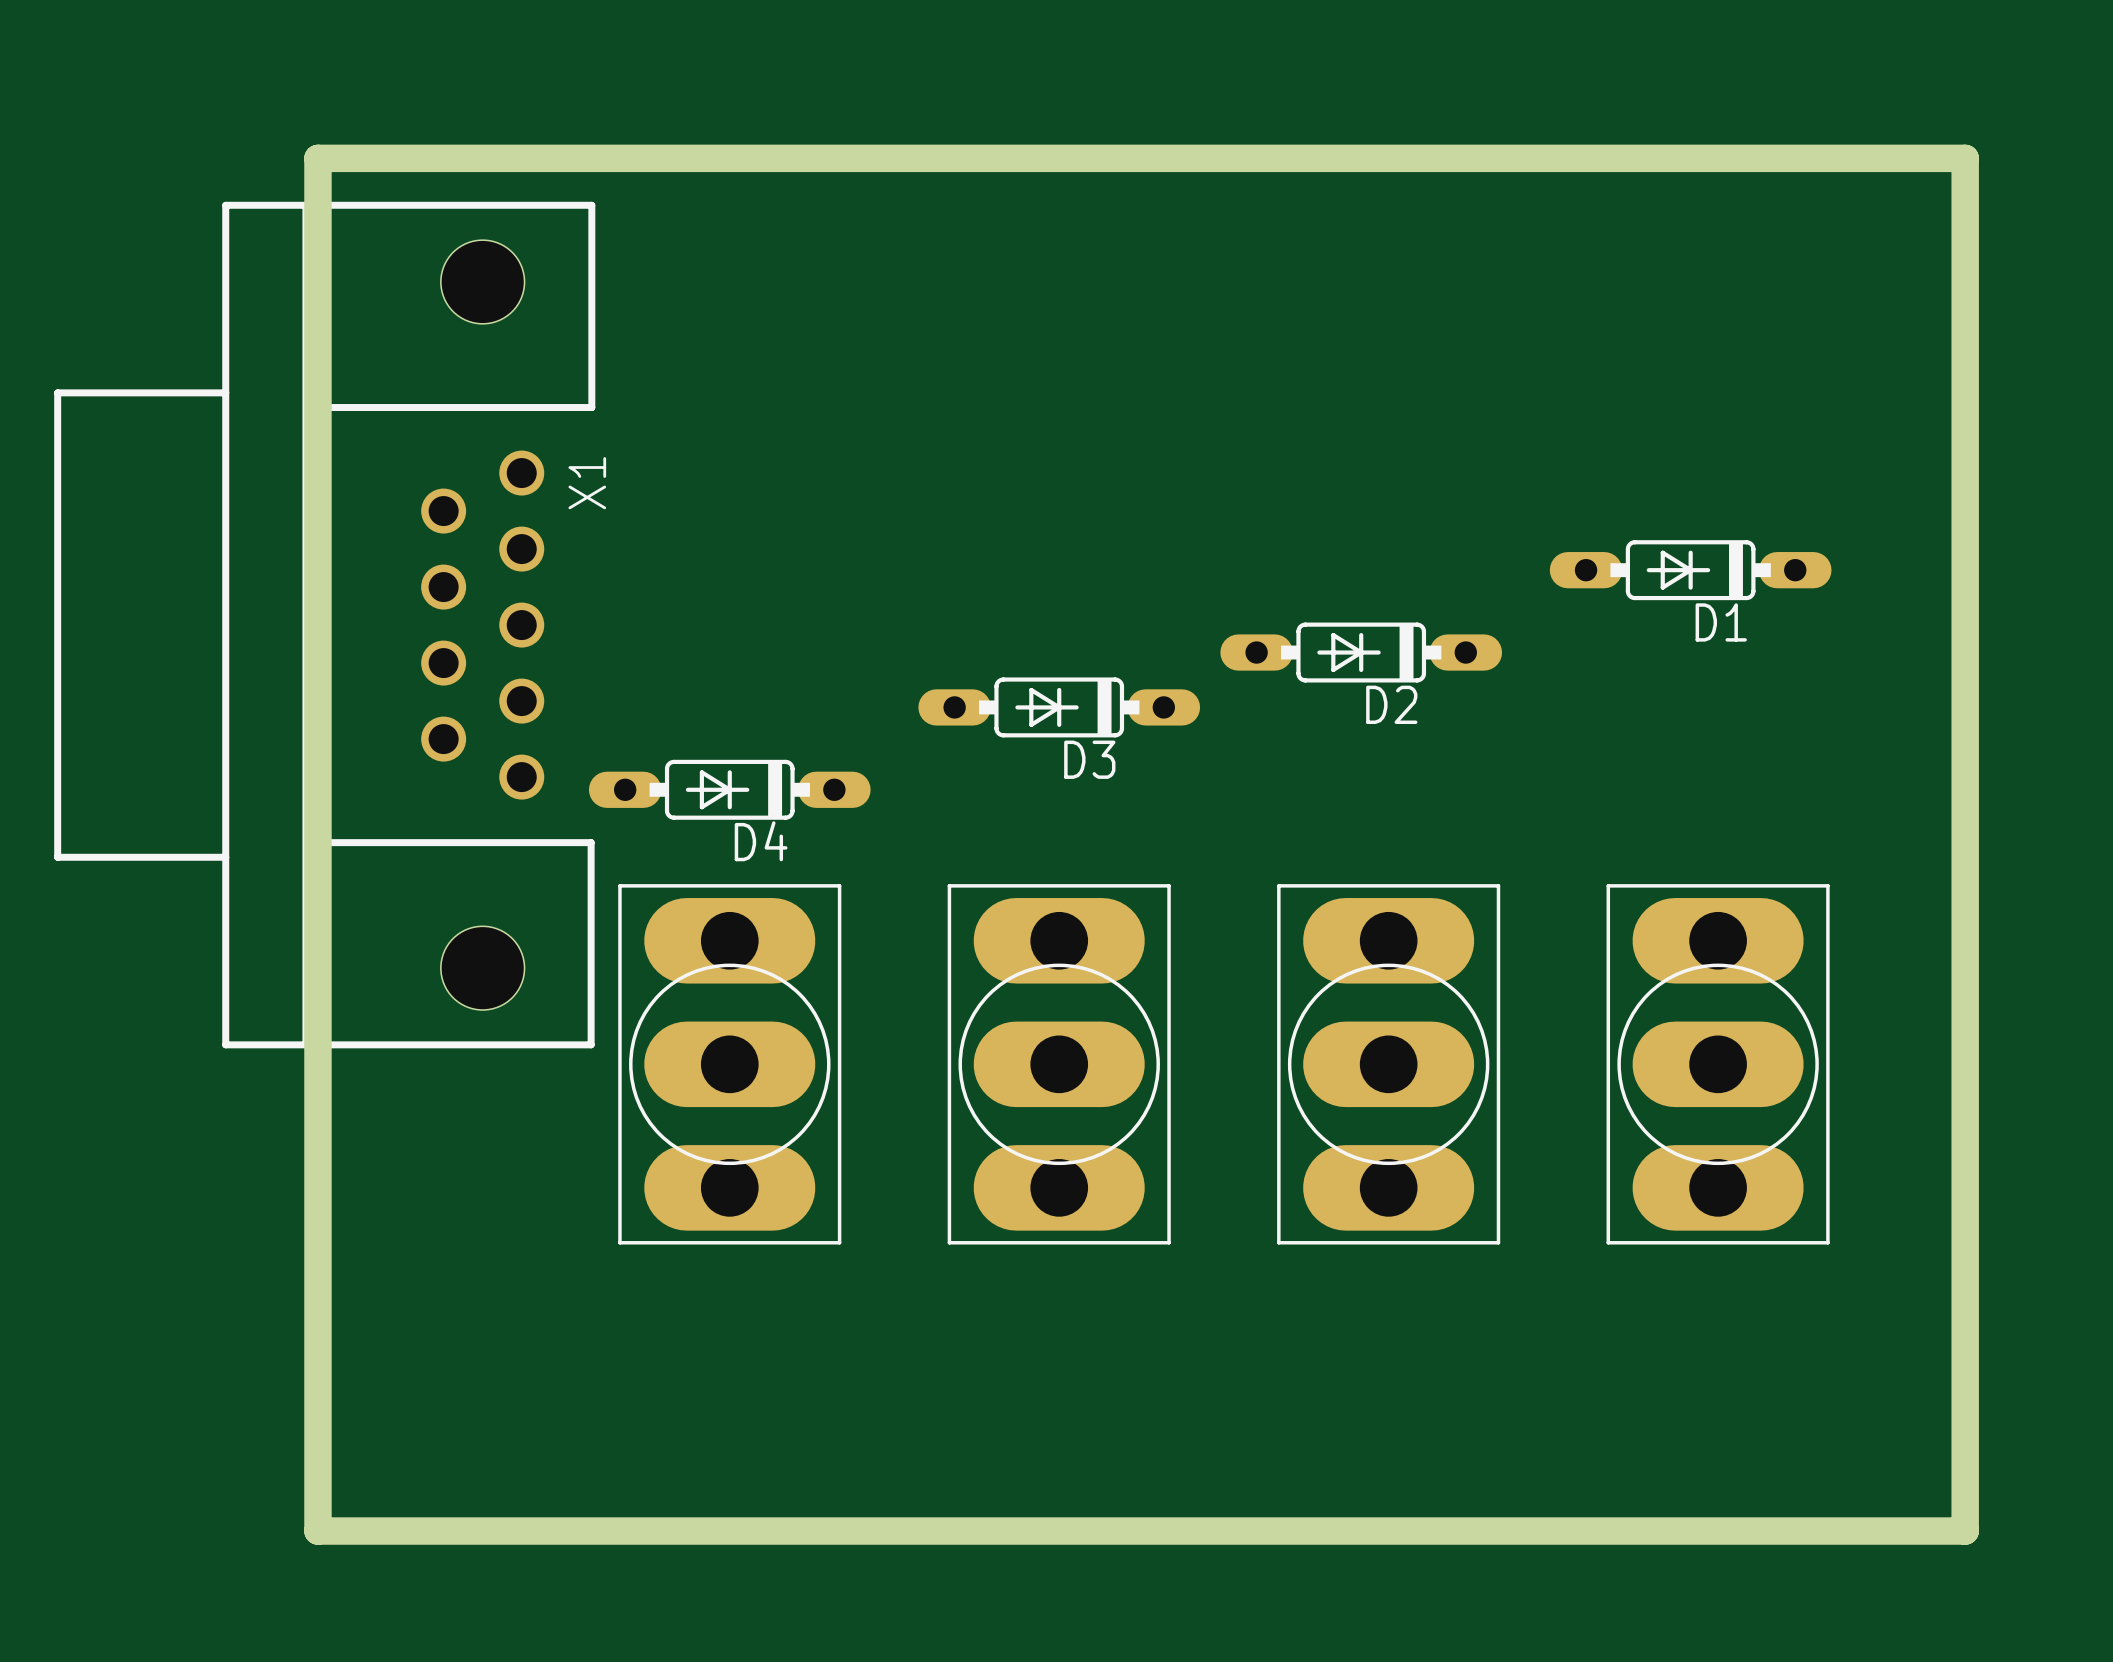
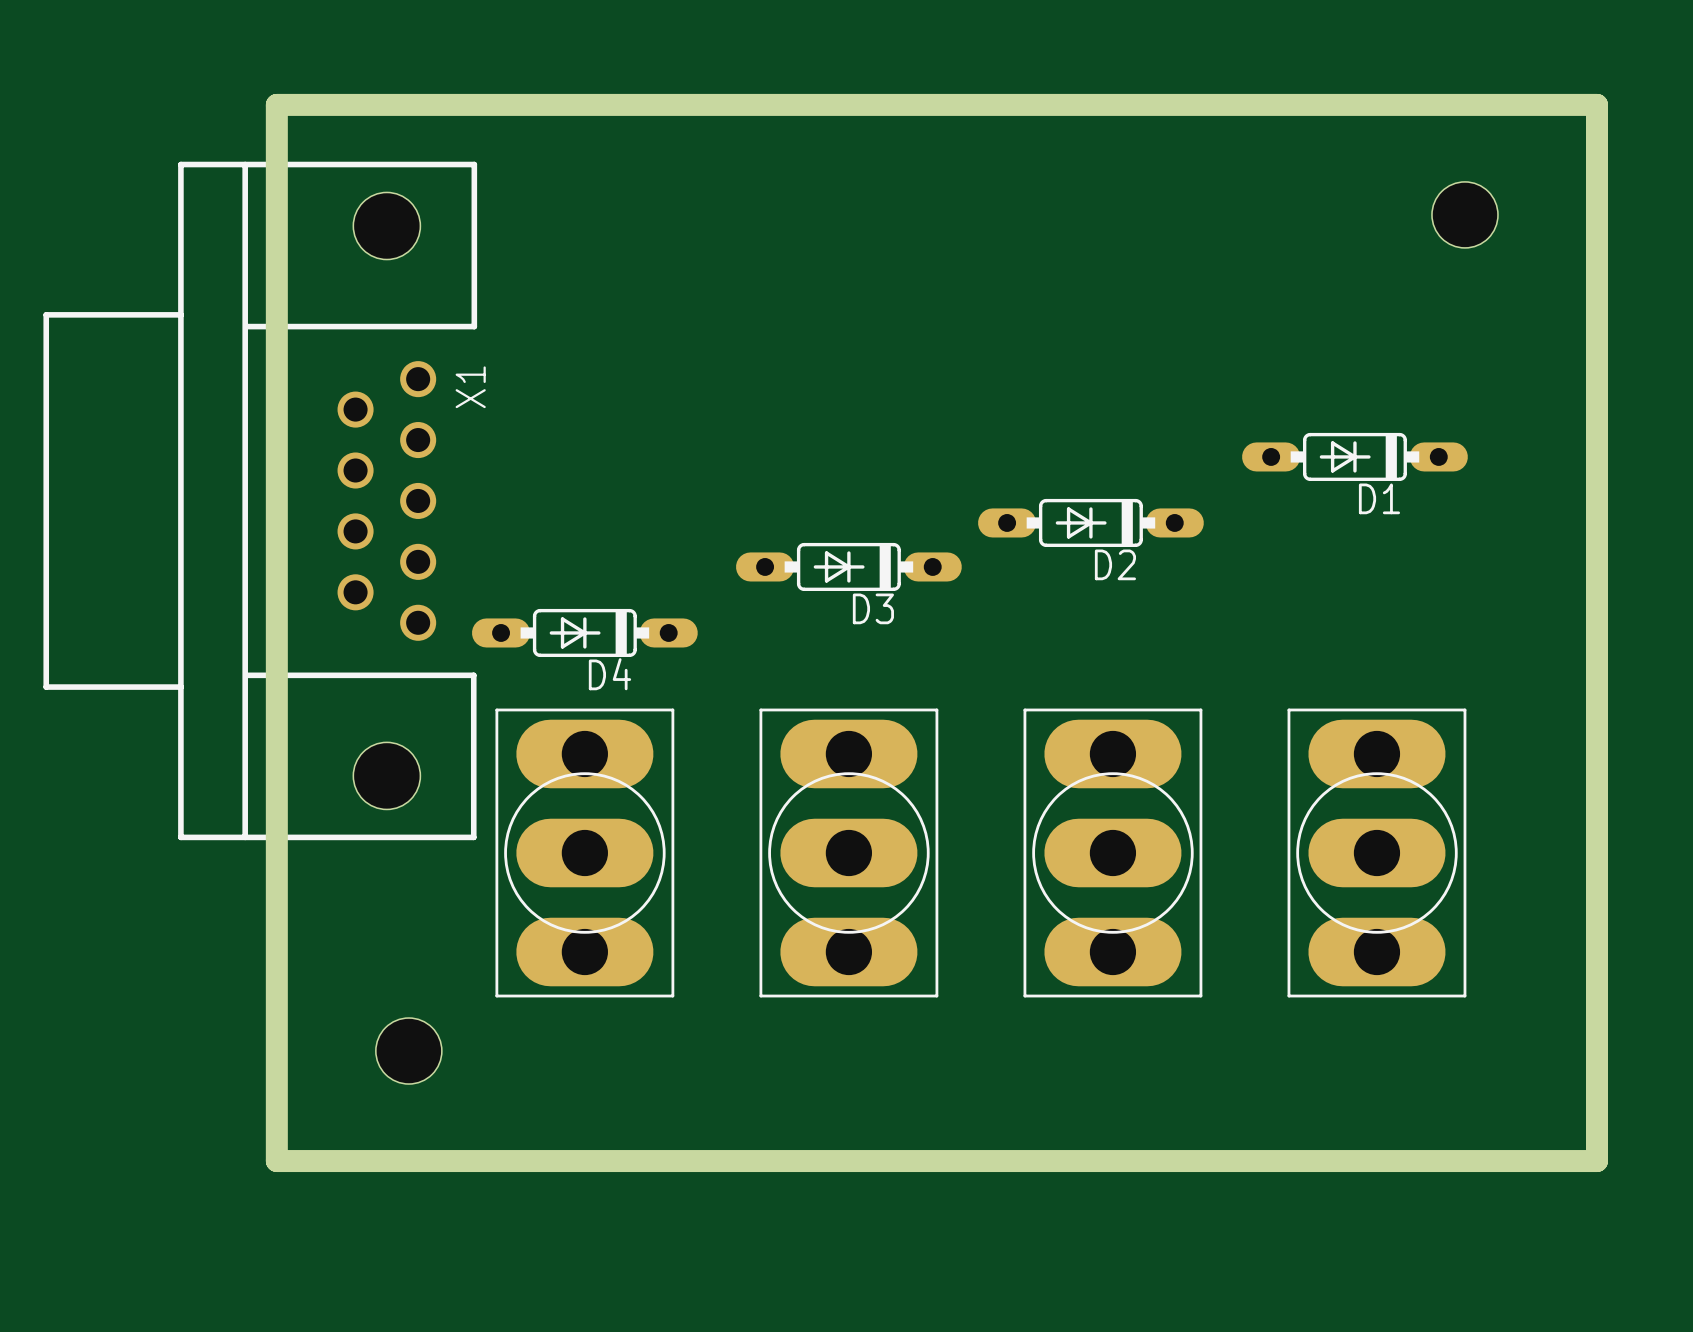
board edge: (317, 158) (1965, 158) (1965, 1531) (317, 1531) (317, 158) -> (276, 104) (276, 1161) (1596, 1161) (1596, 104) (276, 104)
hole: none -> (1464, 214)
hole: none -> (408, 1051)

